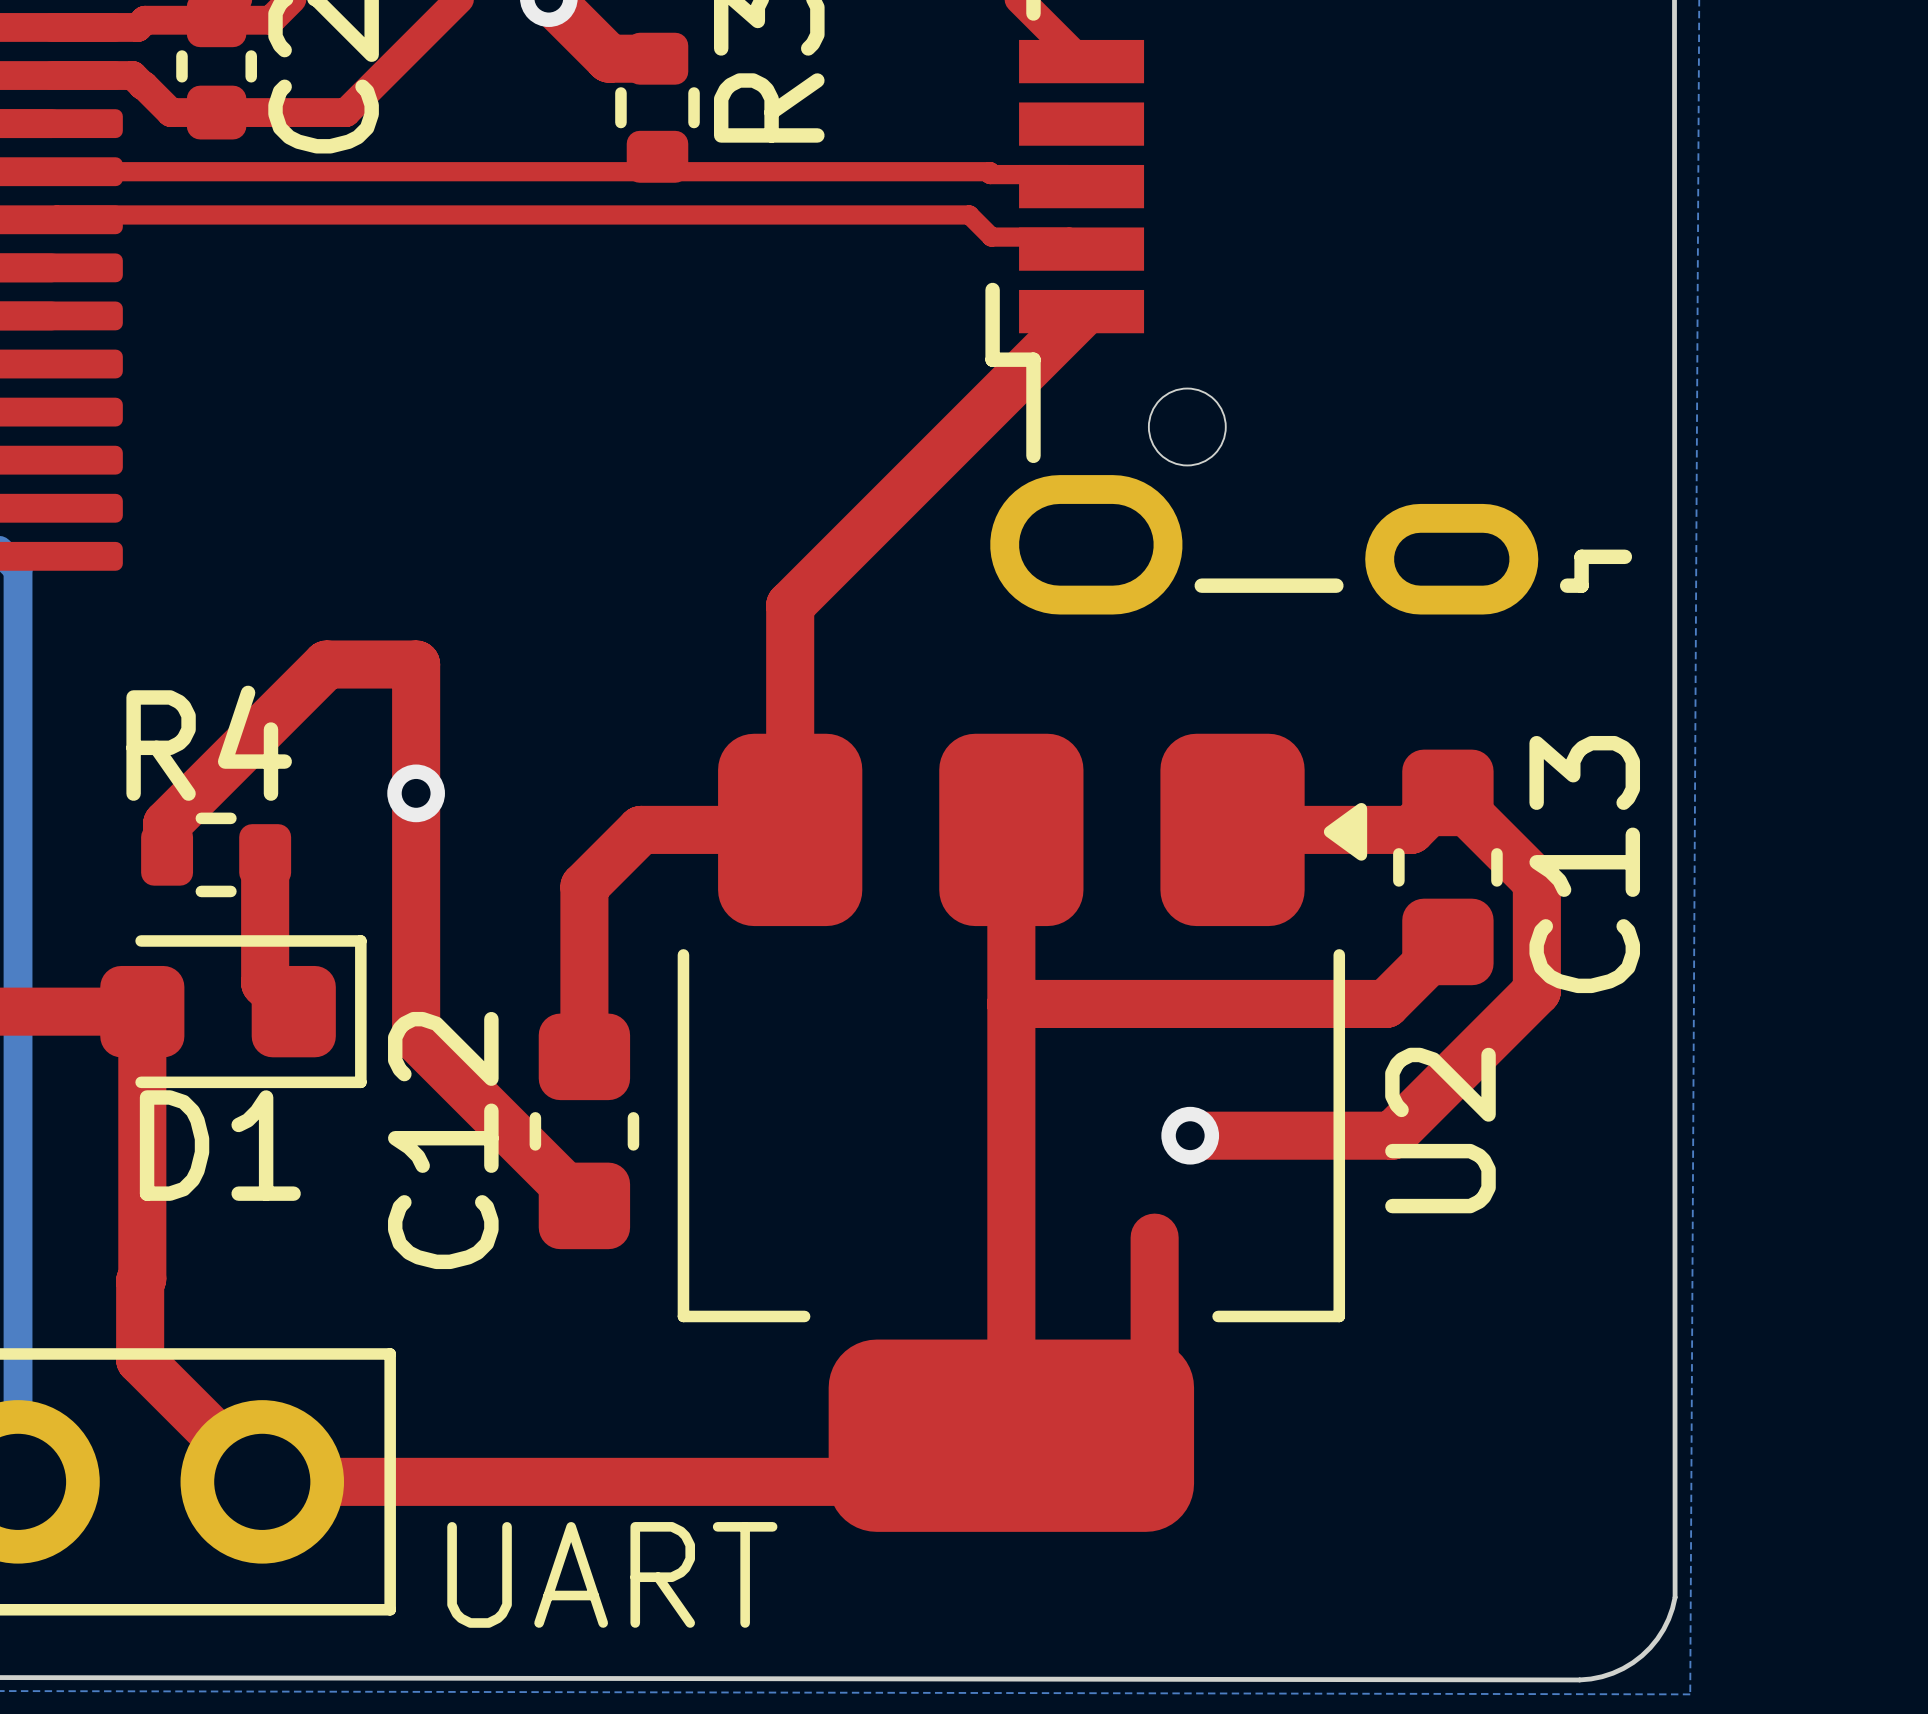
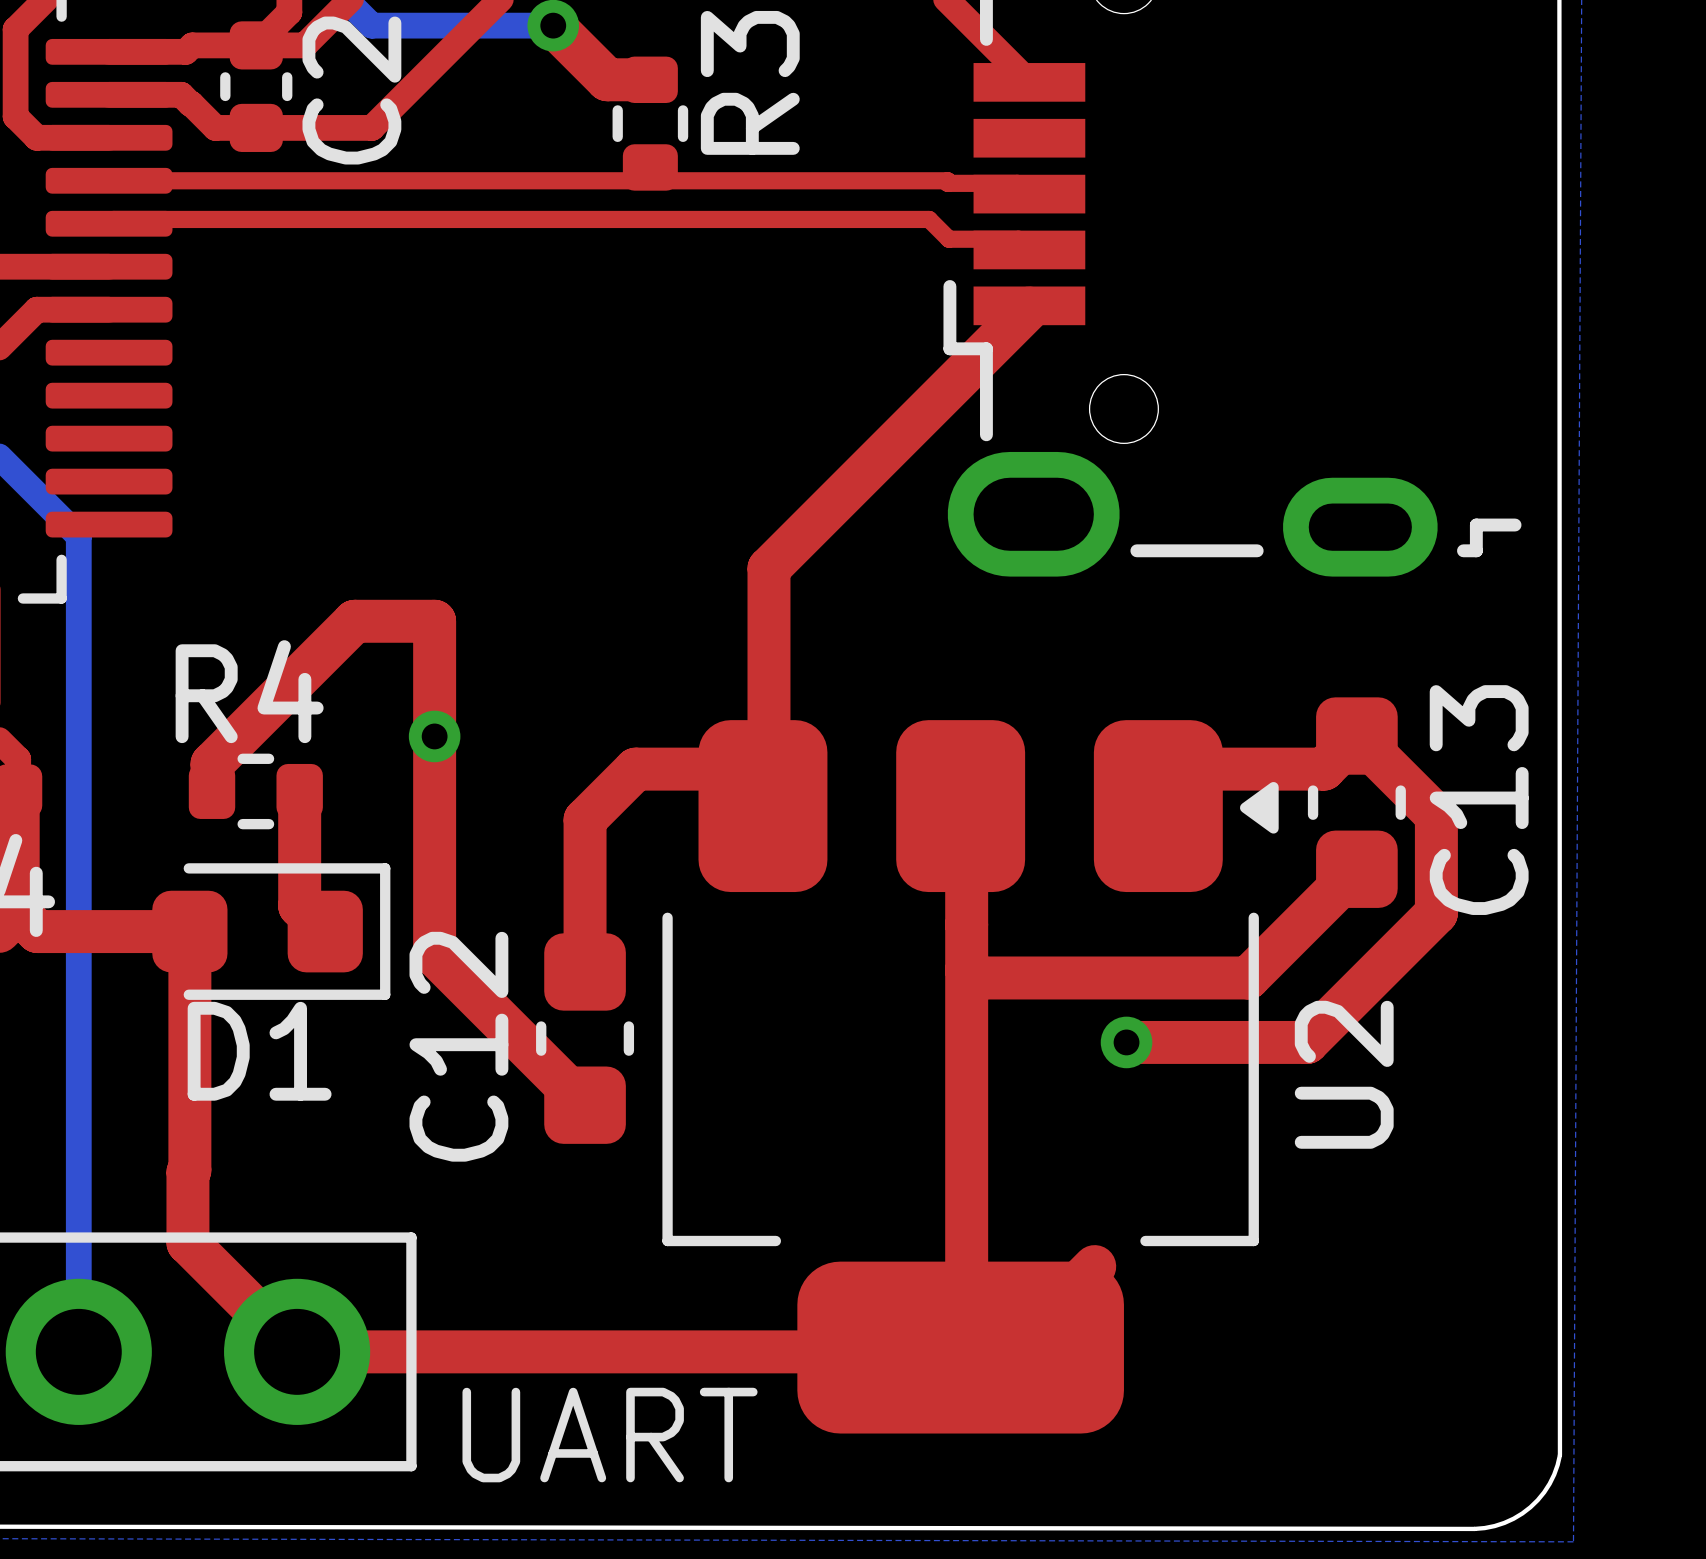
top track: (1011, 1003) (1385, 1003) -> (966, 970) (974, 977) (1248, 977) (1301, 924)
U2 position: (1022, 1132) -> (970, 1076)
top track: (1154, 1237) (1154, 1386) -> none

